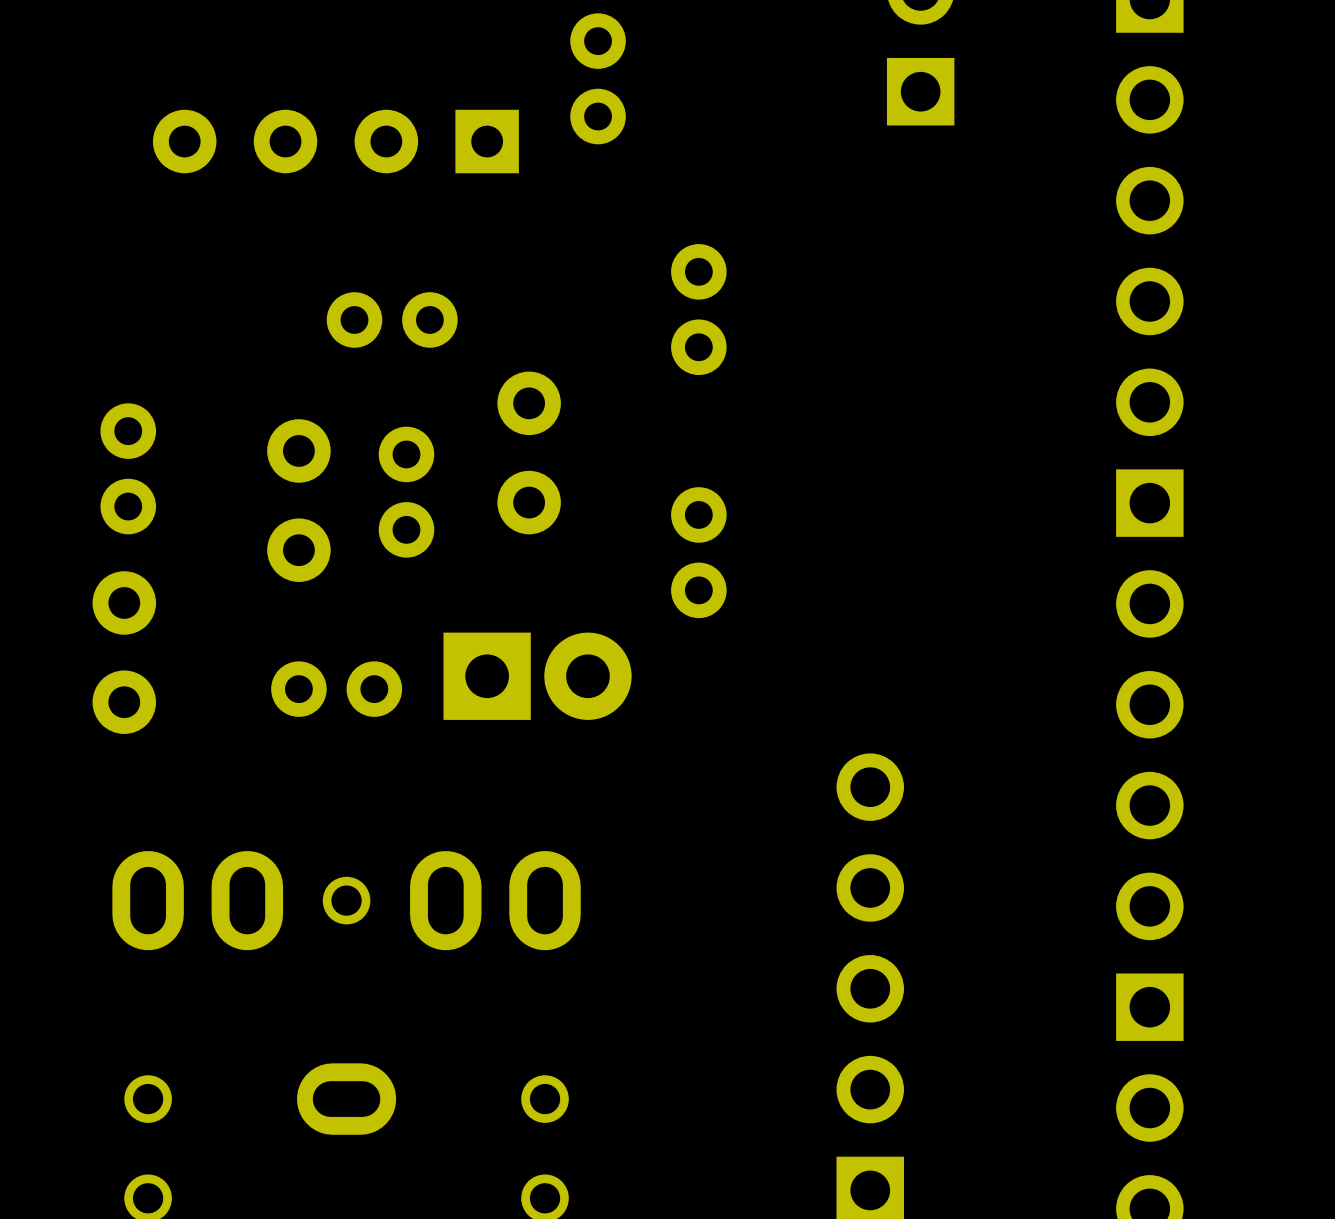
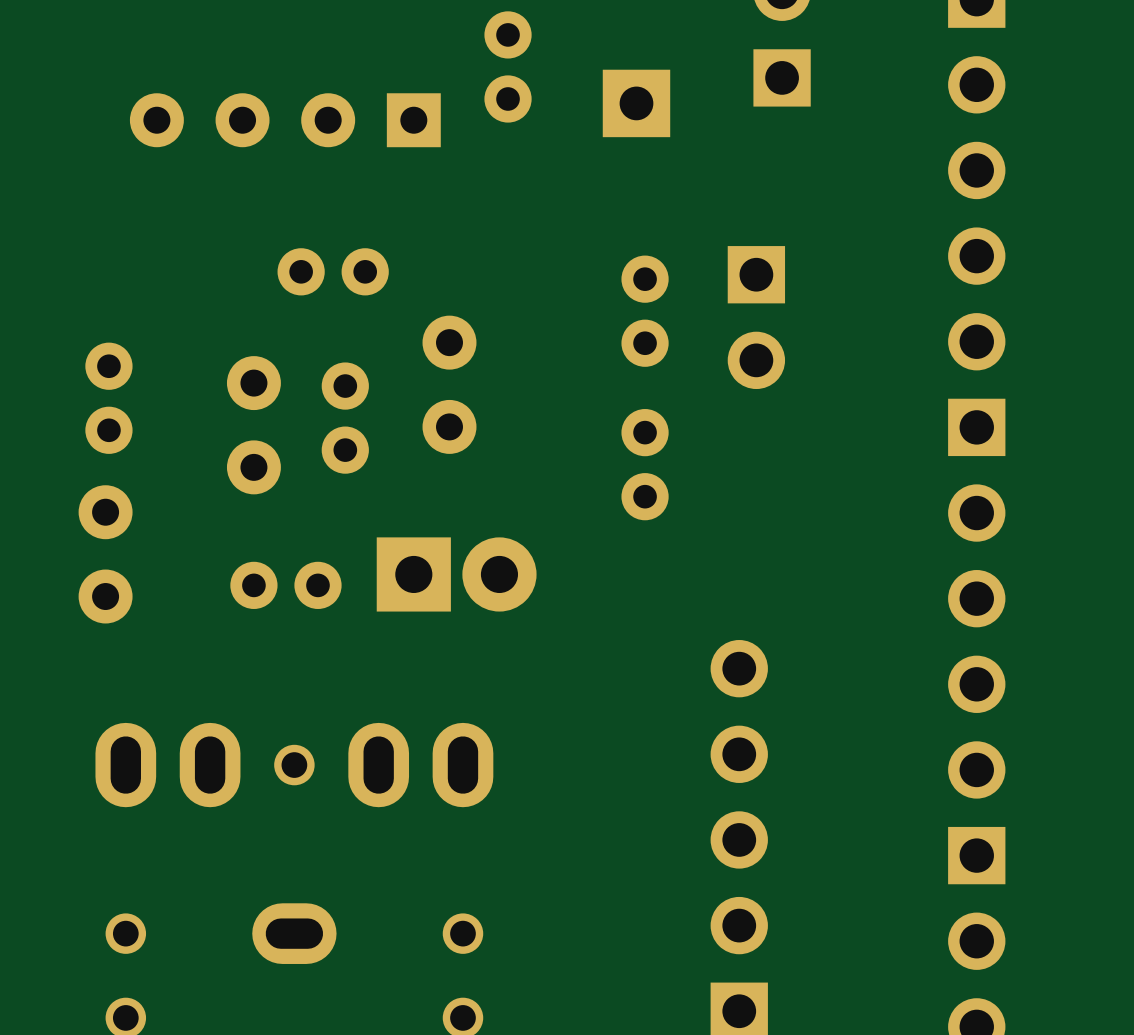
part: none -> (636, 103)
part position: (698, 309) -> (645, 311)
part: none -> (756, 317)
part position: (698, 552) -> (645, 464)

